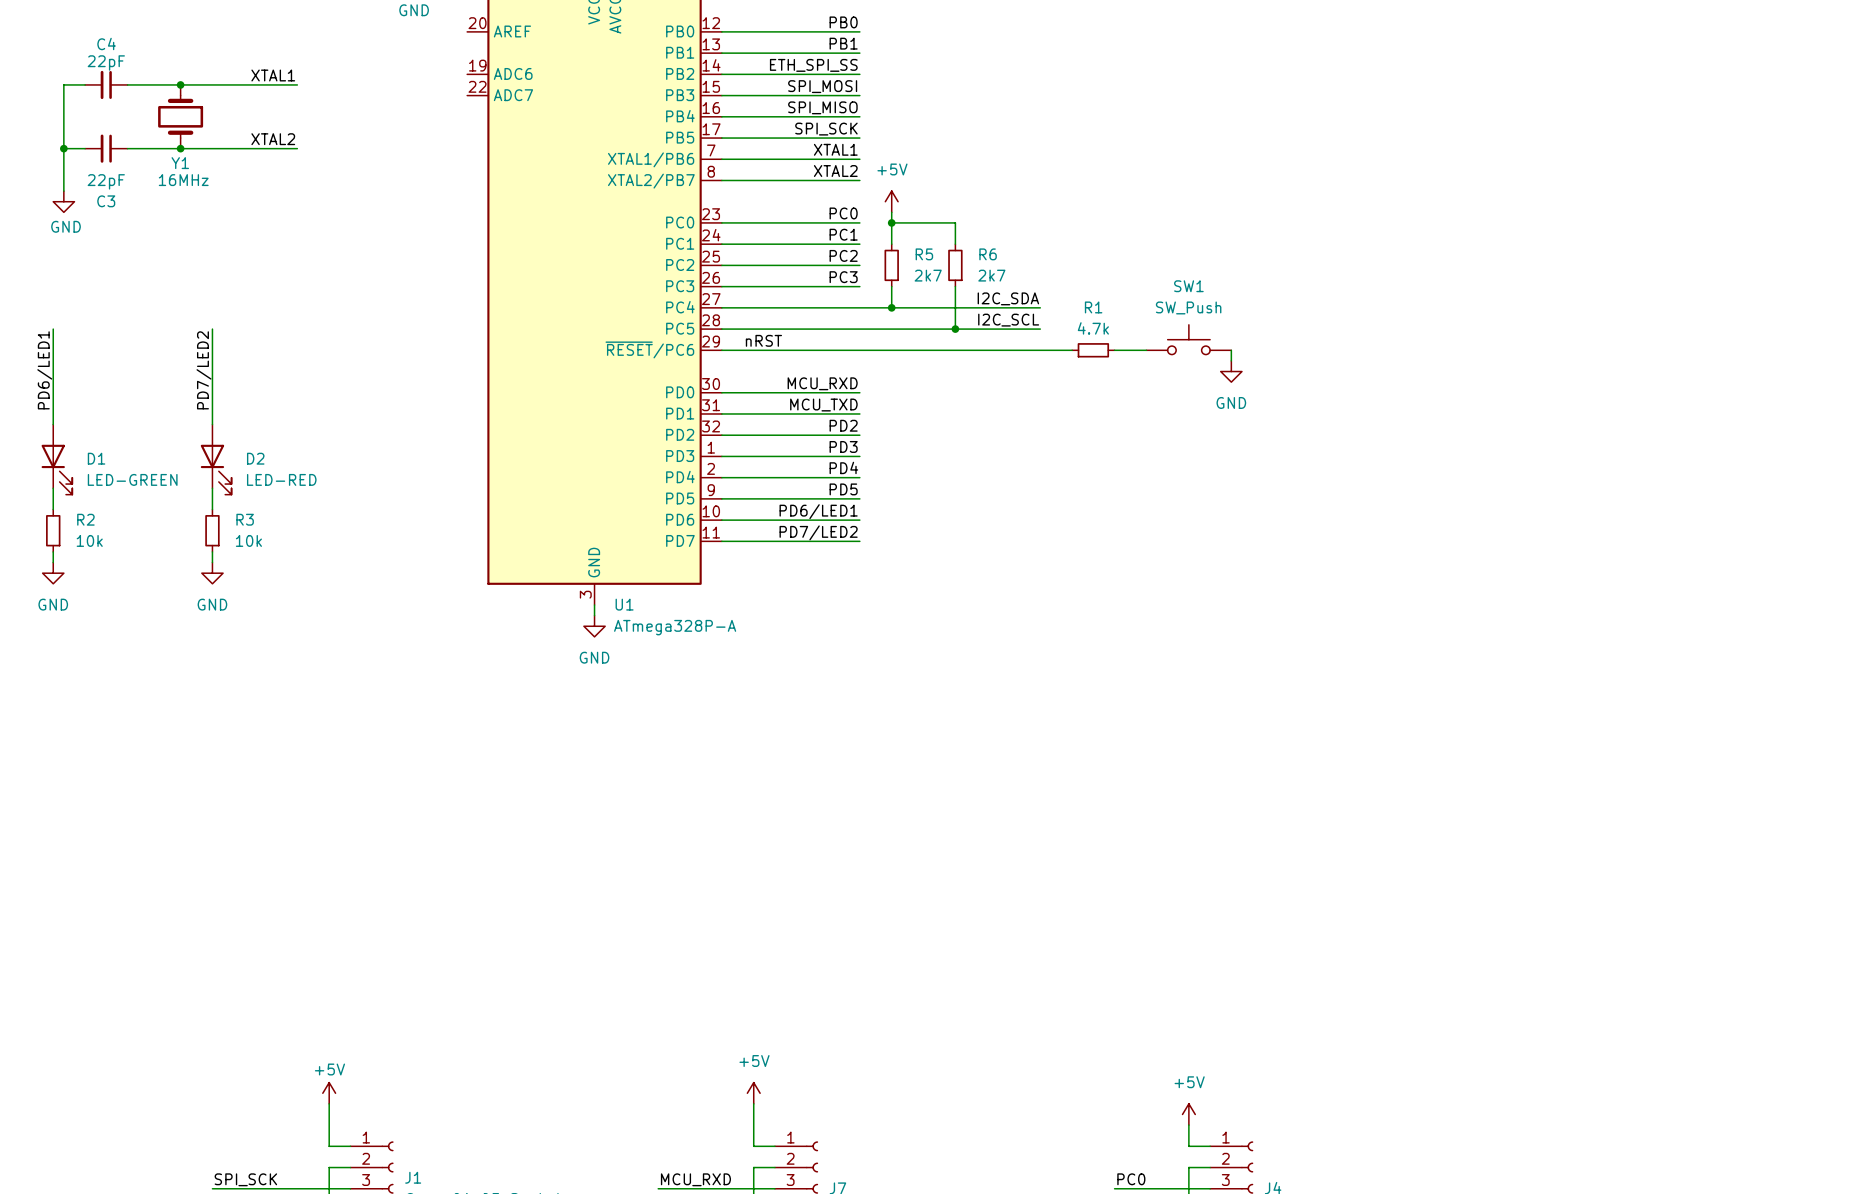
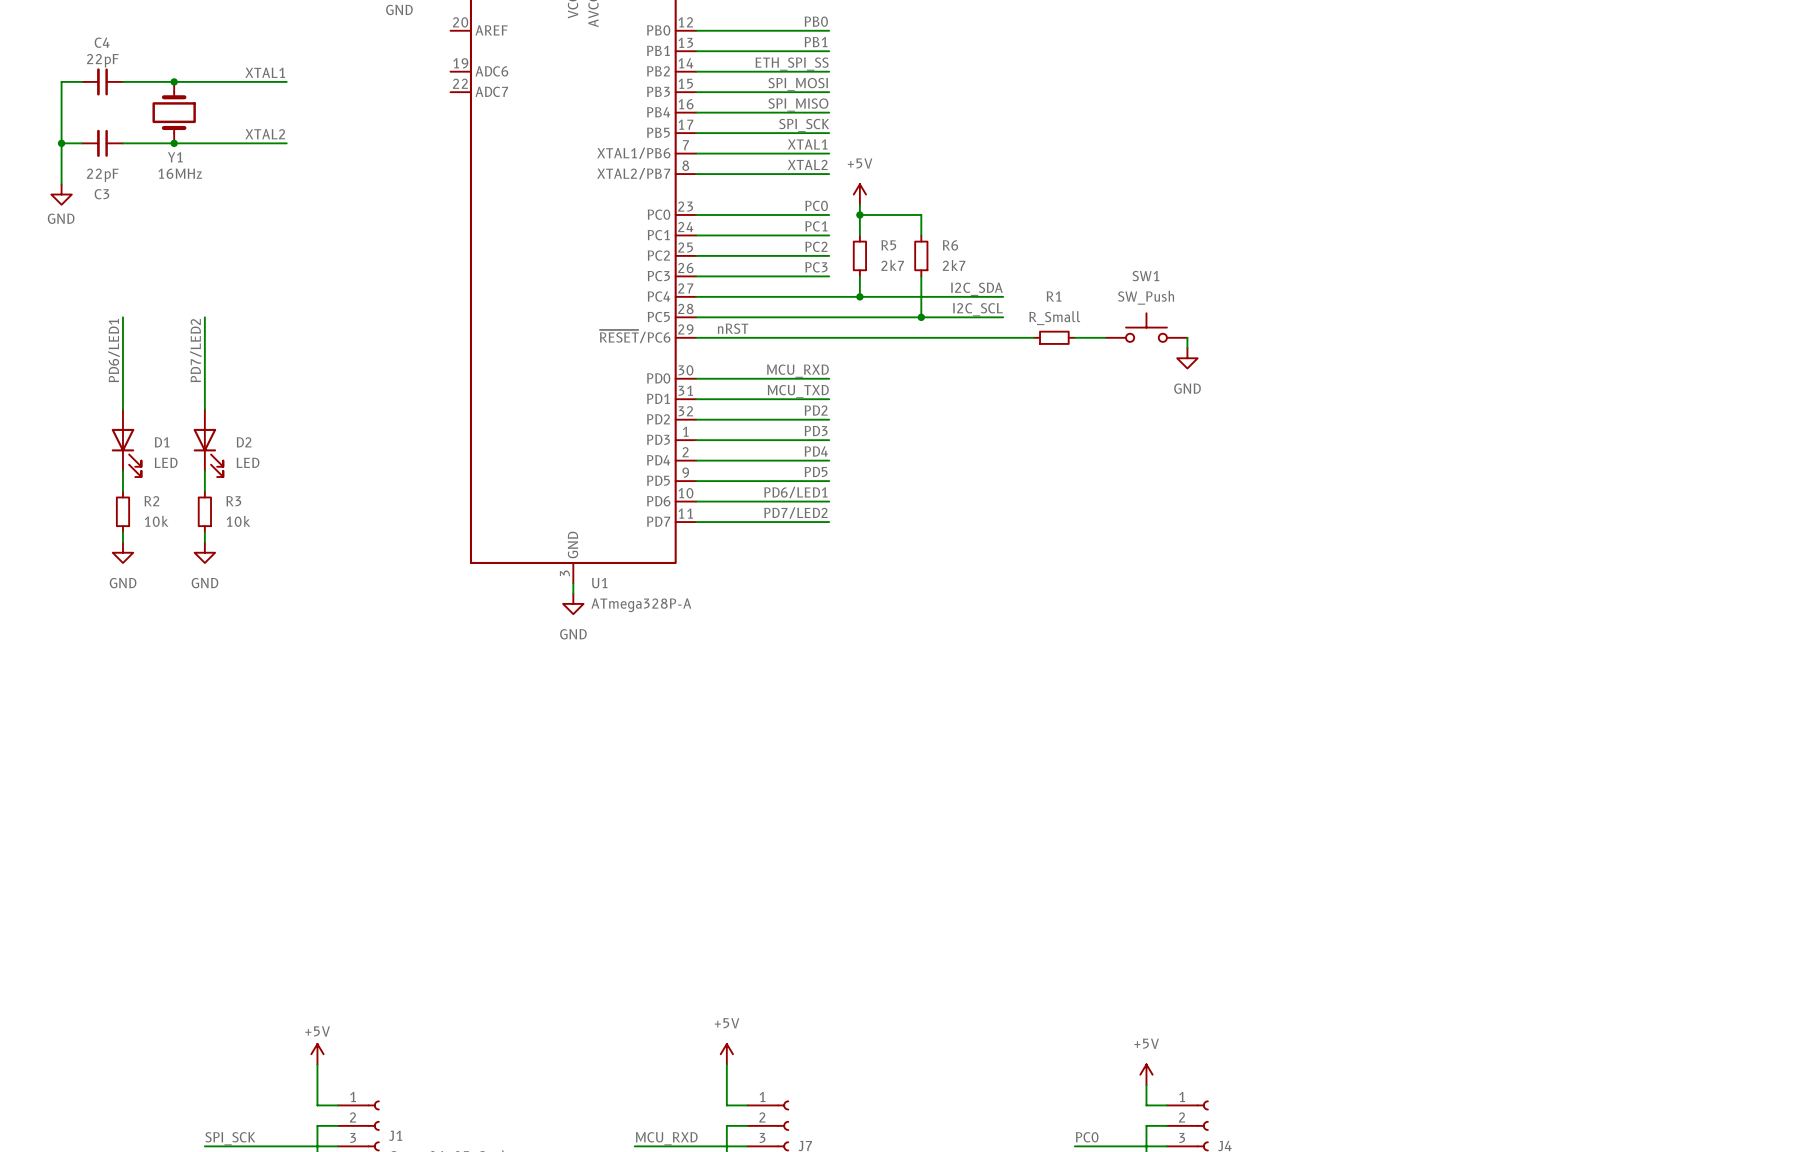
R1 value: 4.7k (1093, 328) -> R_Small (1054, 318)
wire: (53, 329) (53, 424) -> (122, 317) (122, 409)
label position: PD6/LED1 (44, 370) -> PD6/LED1 (113, 350)
D1 position: (56, 459) -> (126, 443)
D1 value: LED-GREEN (132, 479) -> LED (166, 462)
D2 value: LED-RED (281, 479) -> LED (248, 462)
wire: (53, 488) (53, 509) -> (122, 470) (122, 491)
R2 position: (53, 530) -> (122, 511)
wire: (53, 551) (53, 562) -> (122, 532) (122, 542)
power symbol position: GND (53, 573) -> GND (122, 552)

